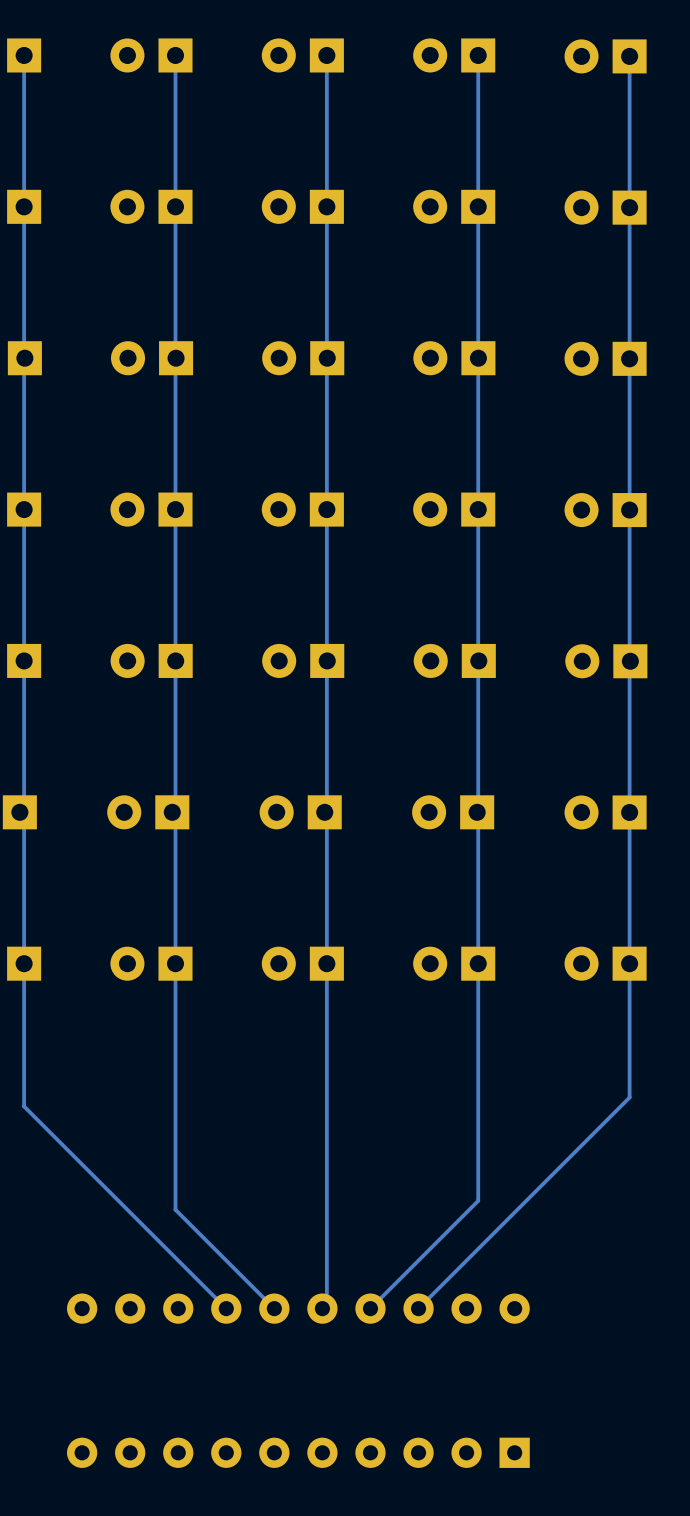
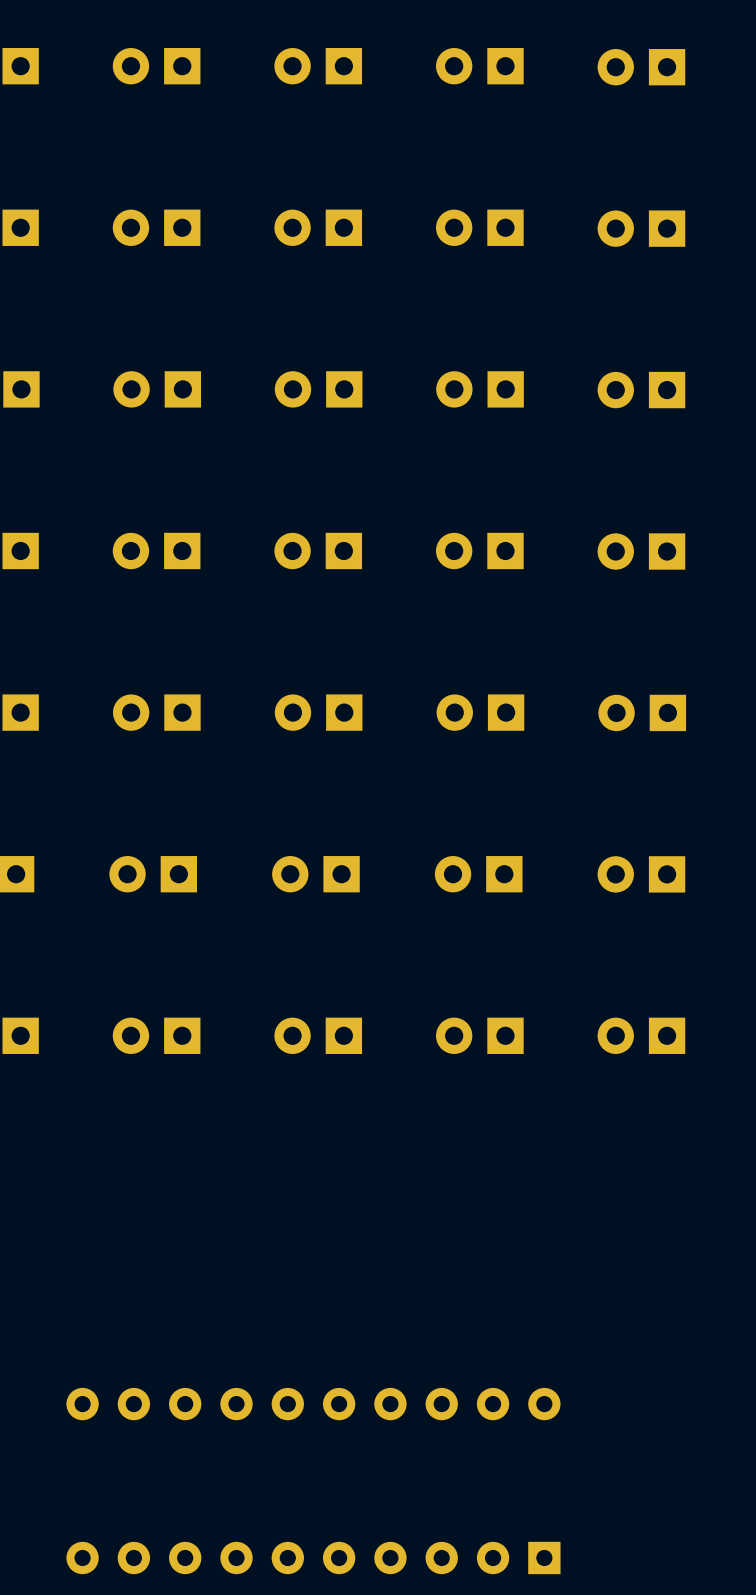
track: (24, 55) (24, 1106) (226, 1308) -> none
track: (175, 55) (175, 1209) (274, 1308) -> none
track: (326, 55) (326, 1304) (322, 1308) -> none
track: (478, 55) (478, 1200) (370, 1308) -> none
track: (629, 56) (629, 1097) (418, 1308) -> none

